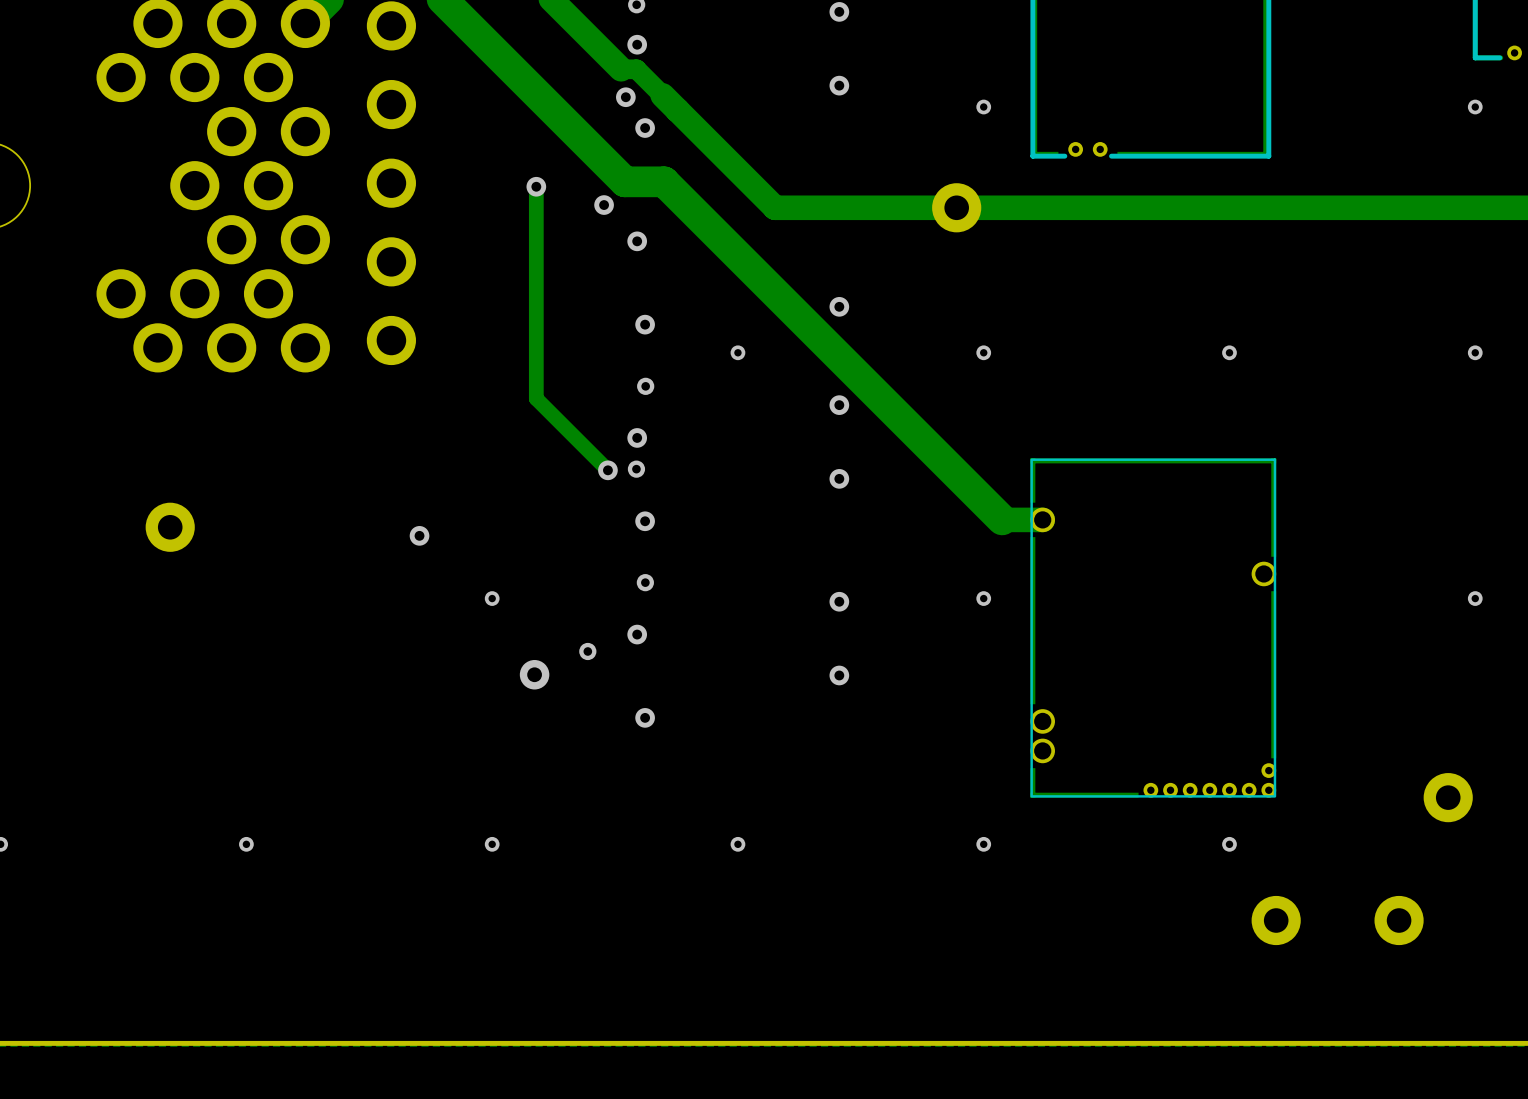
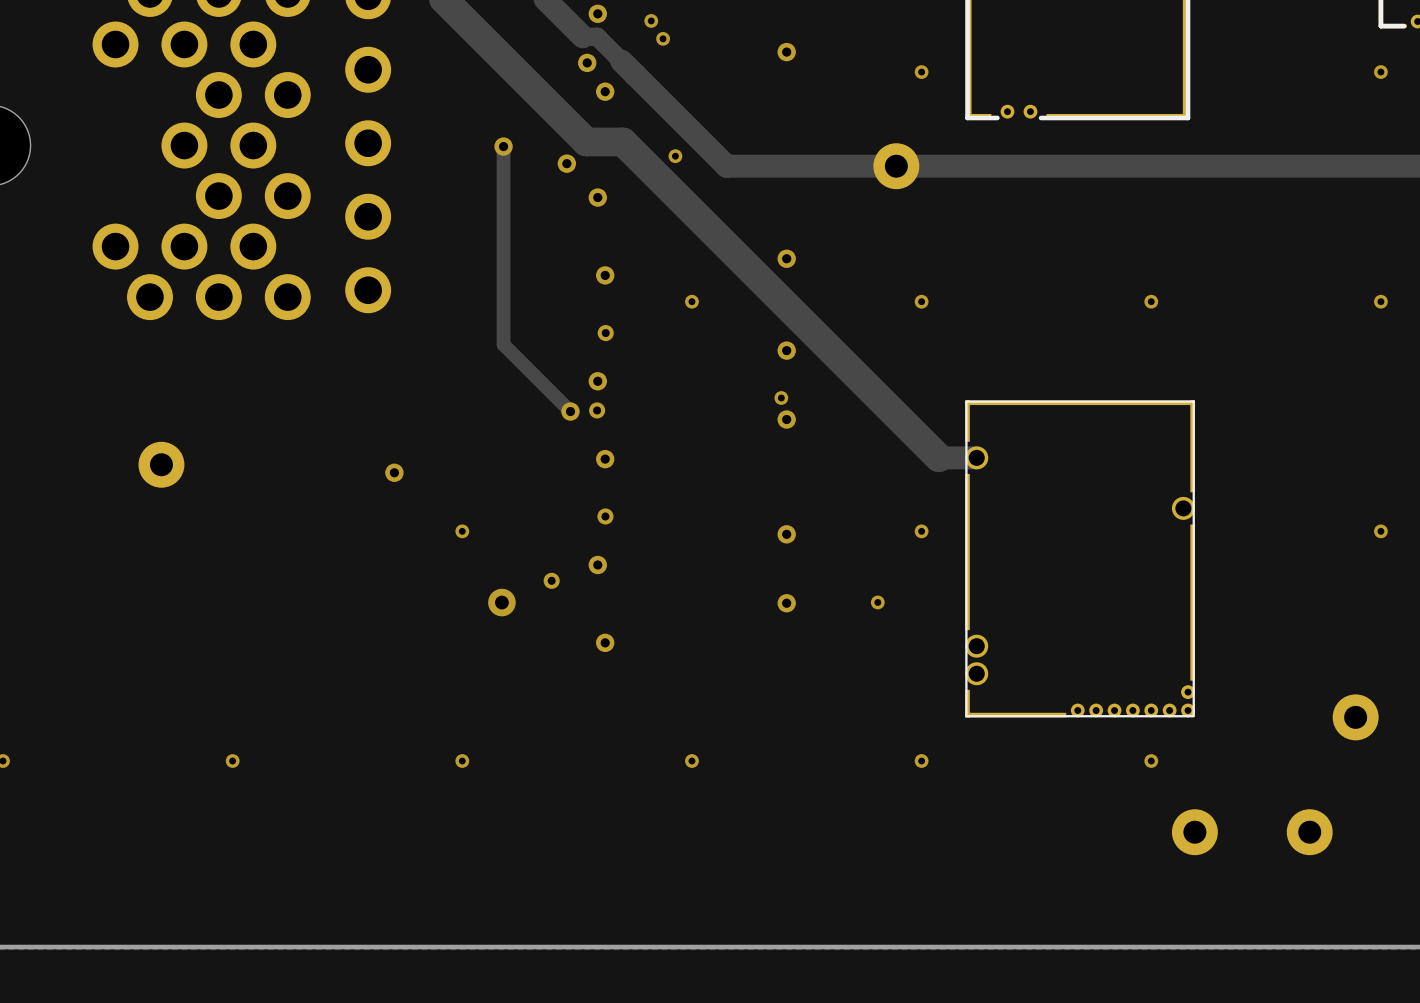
via: none -> (651, 20)
via: none -> (663, 38)
via: none -> (675, 156)
via: none -> (781, 397)
via: none -> (877, 602)

